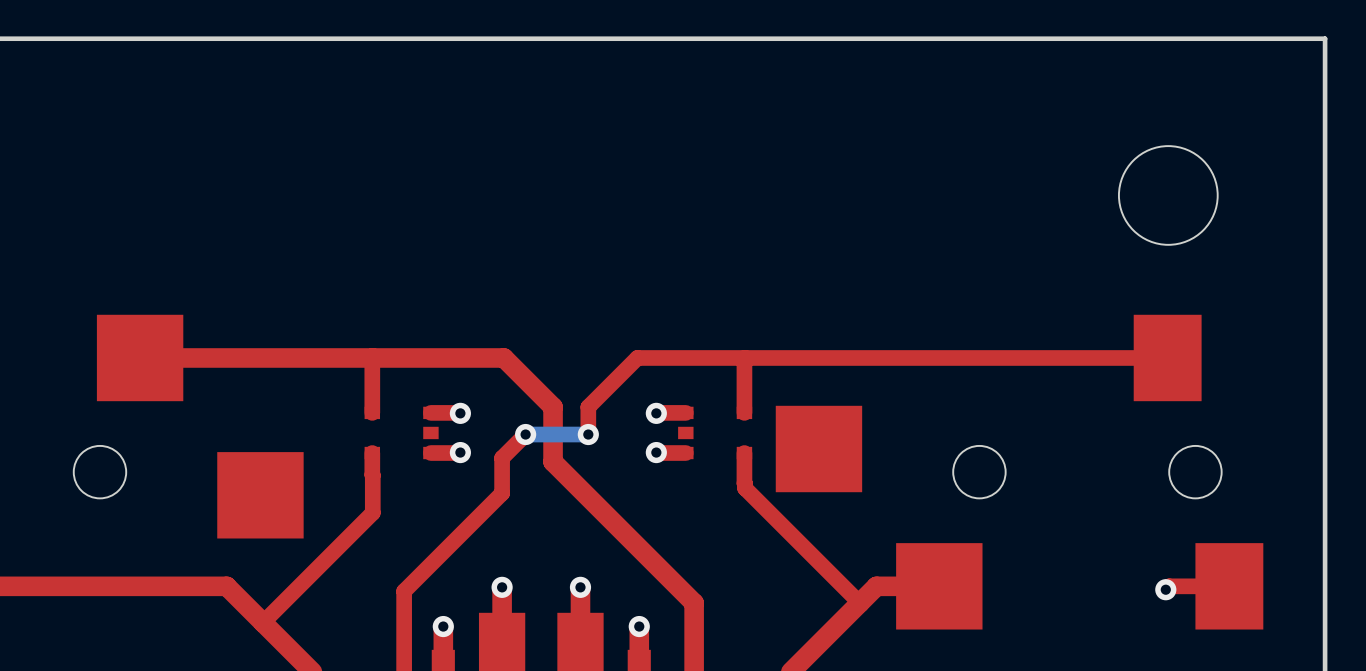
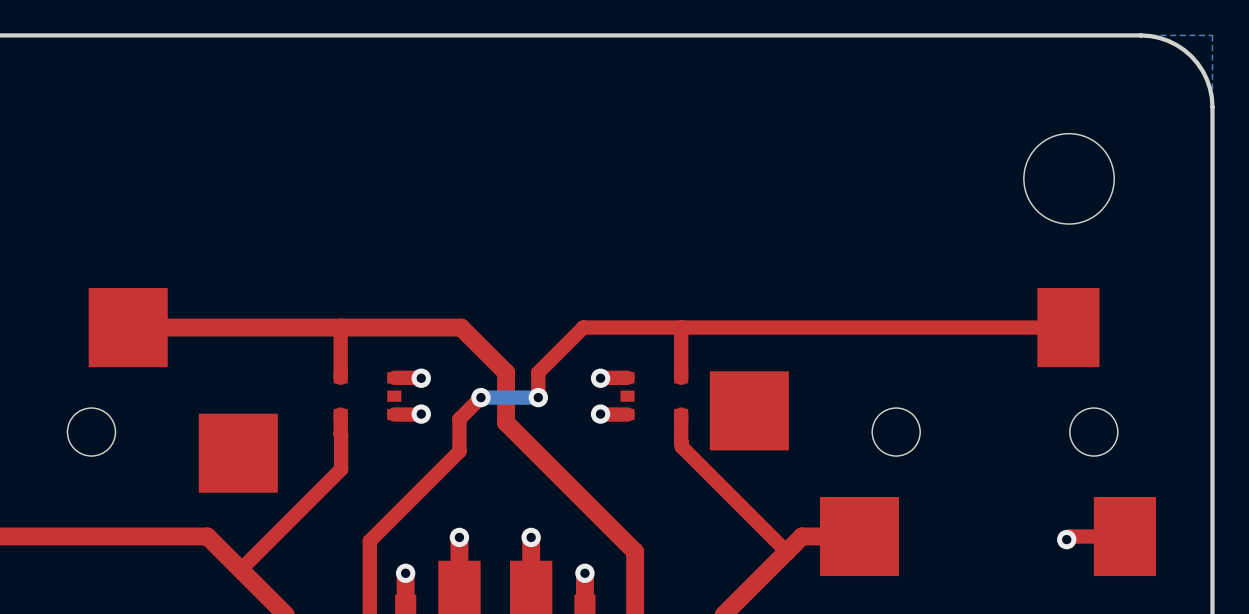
board edge: (1246, 38) (1325, 38) (1325, 117) -> (1140, 35) (1168, 40) (1191, 56) (1207, 79) (1212, 107)

